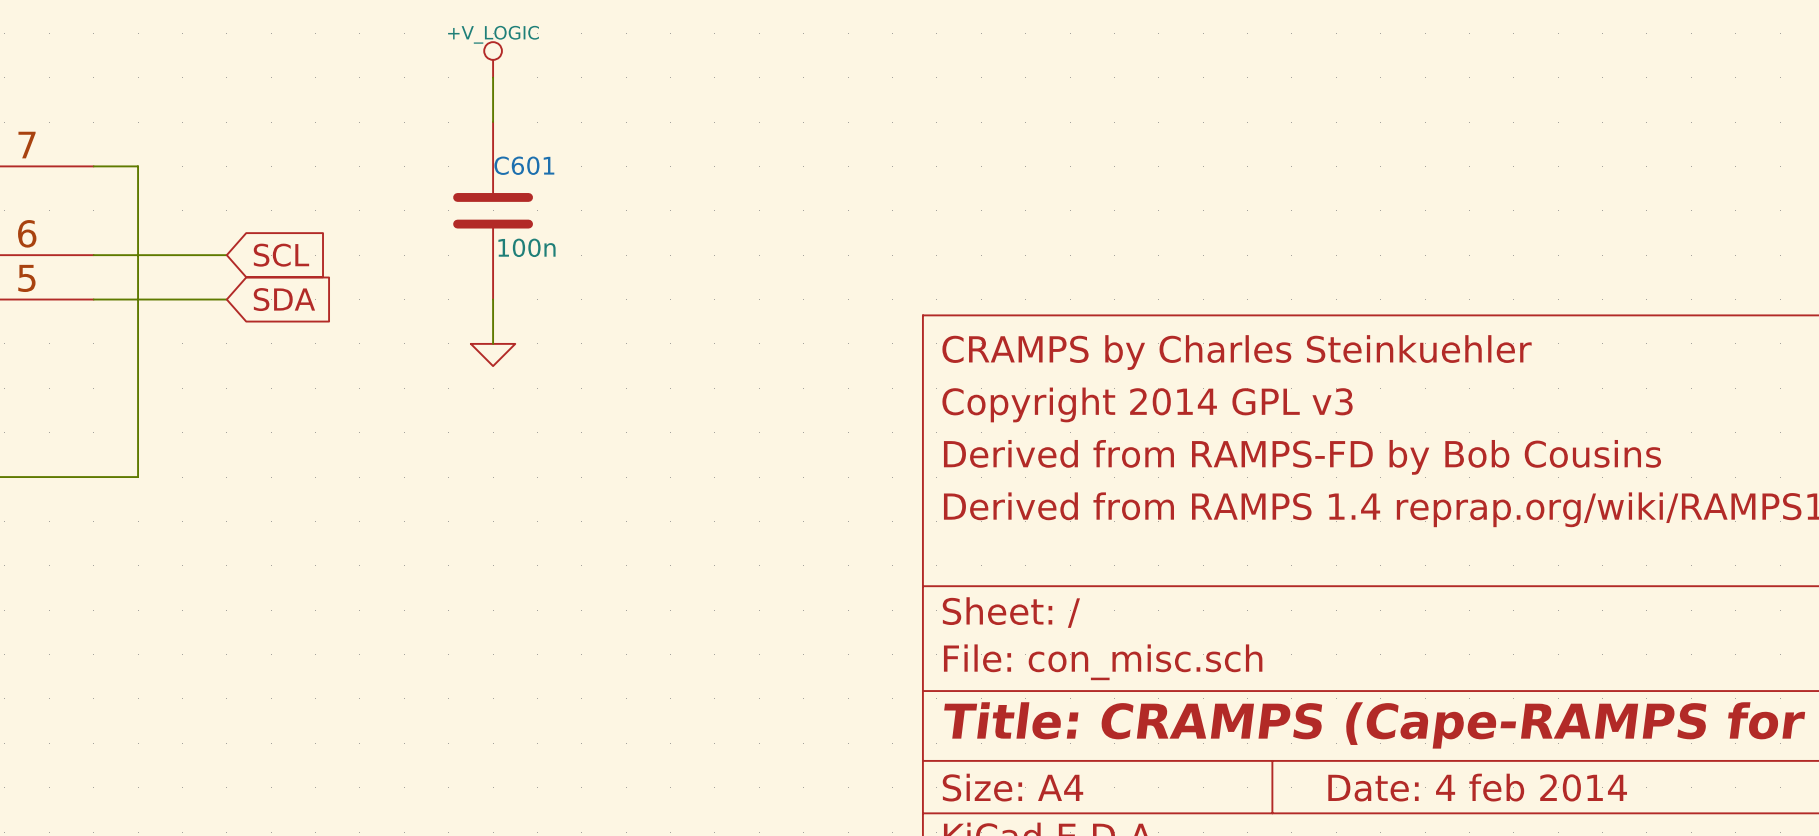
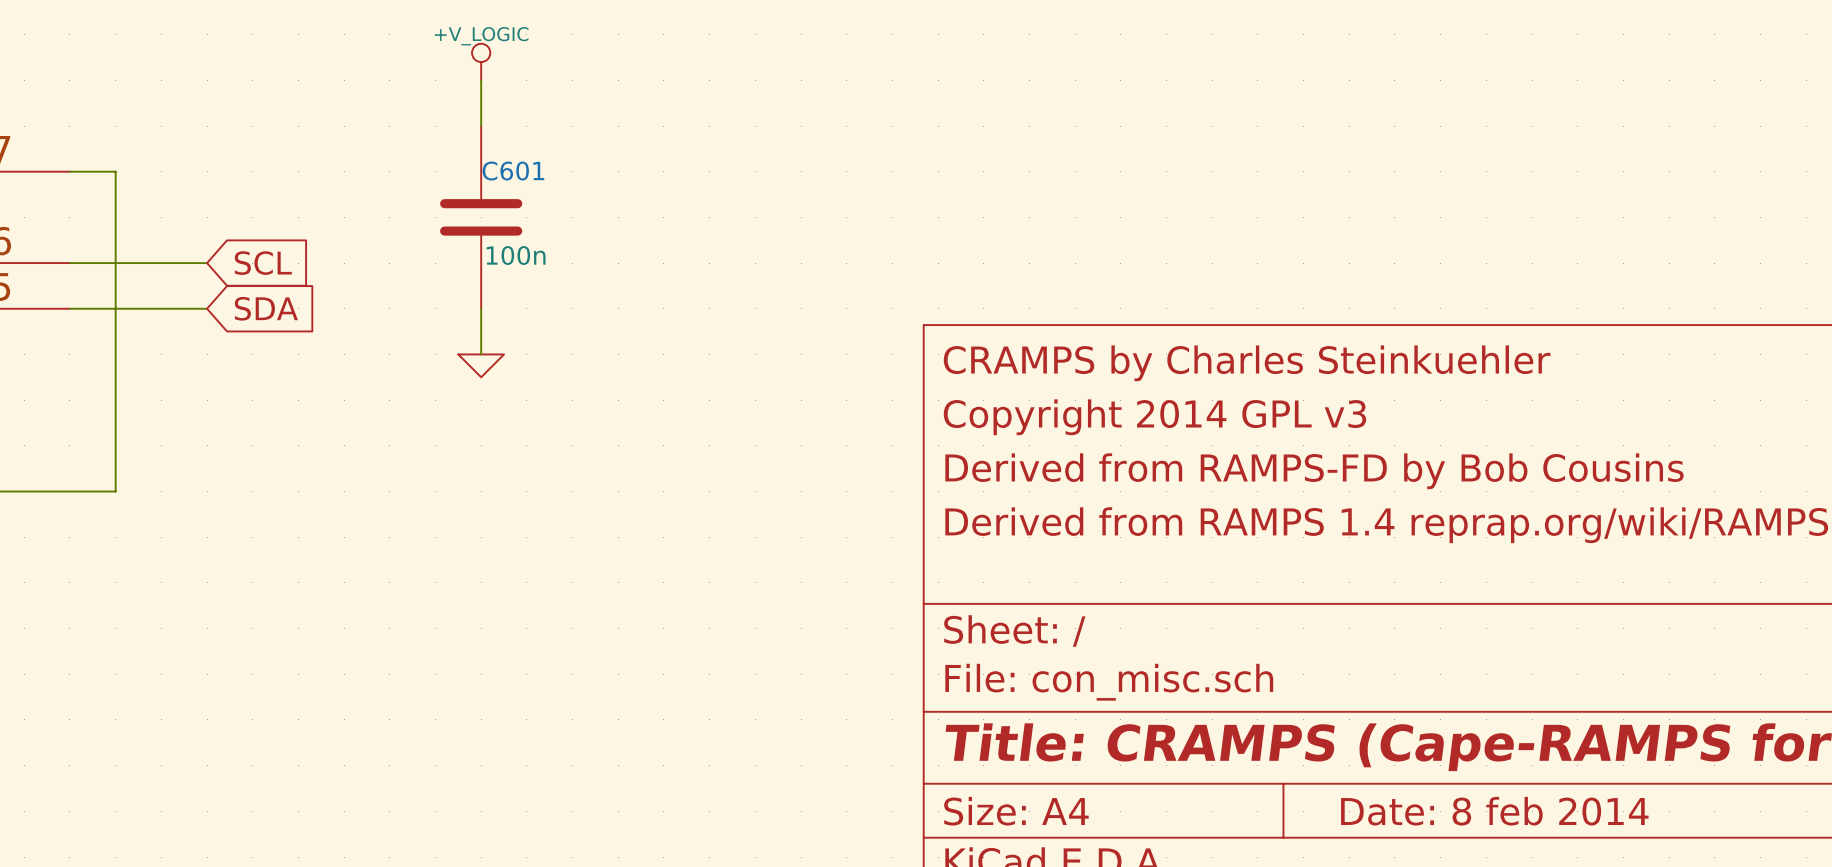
title block: Date: 4 feb 2014 (1477, 787) -> Date: 8 feb 2014 (1494, 811)

